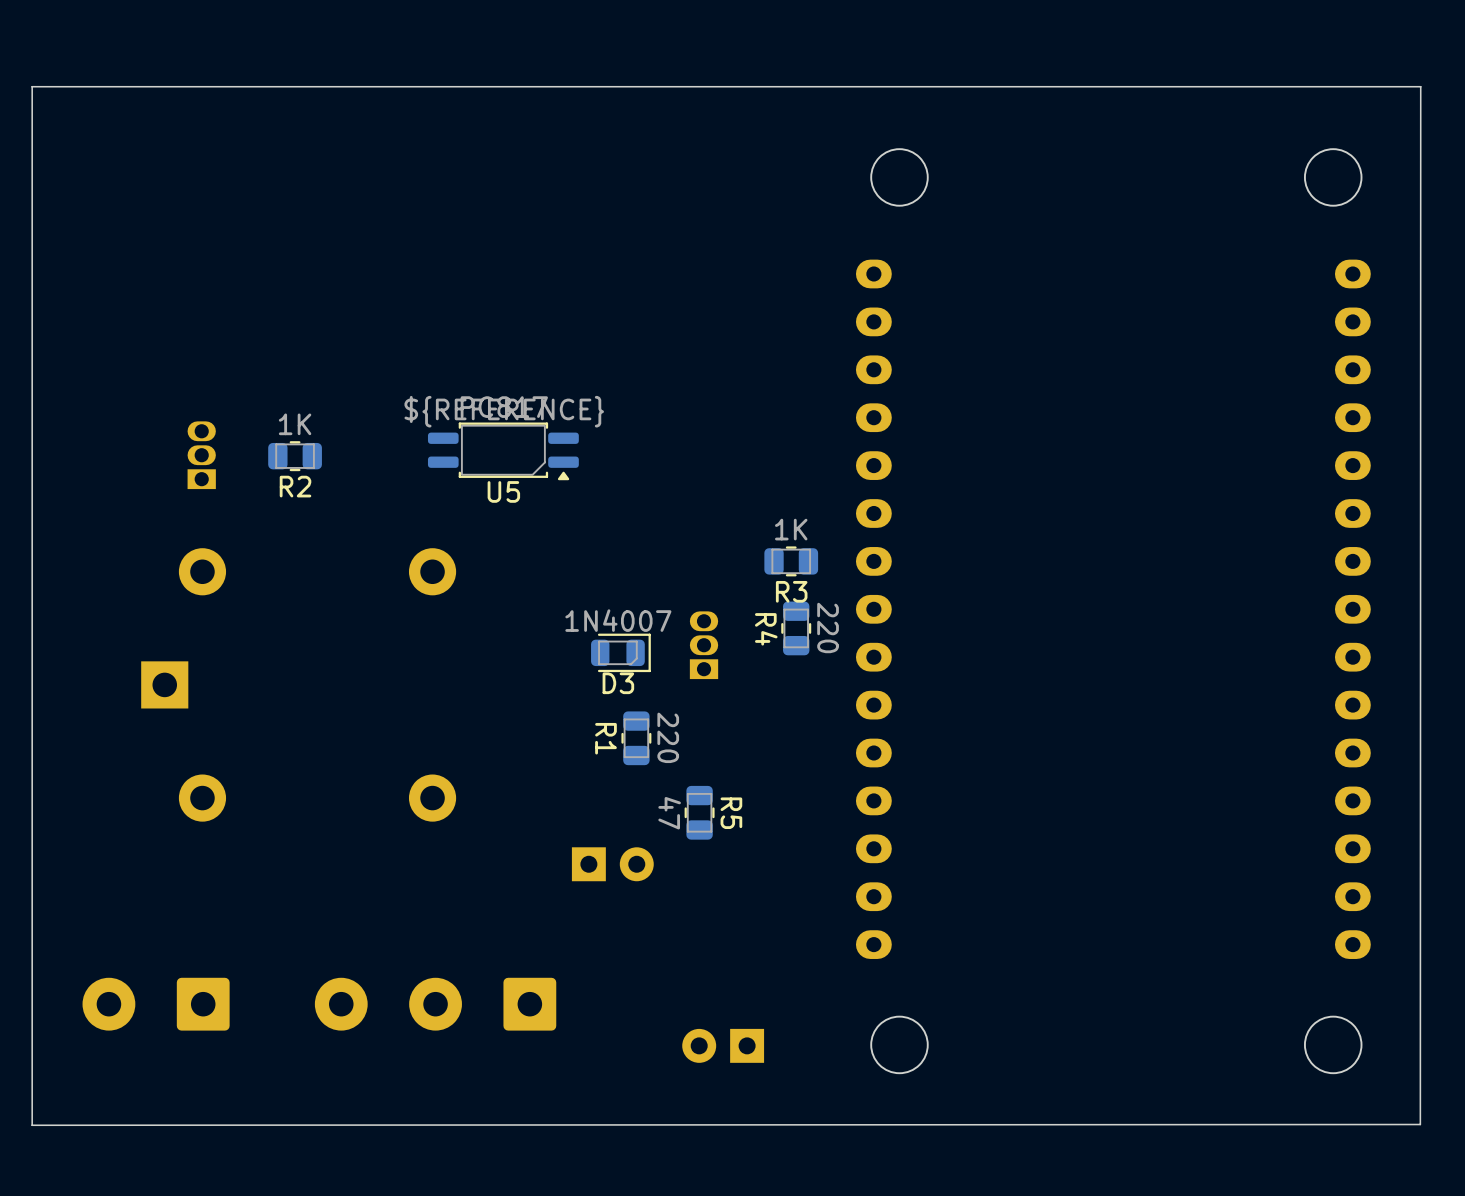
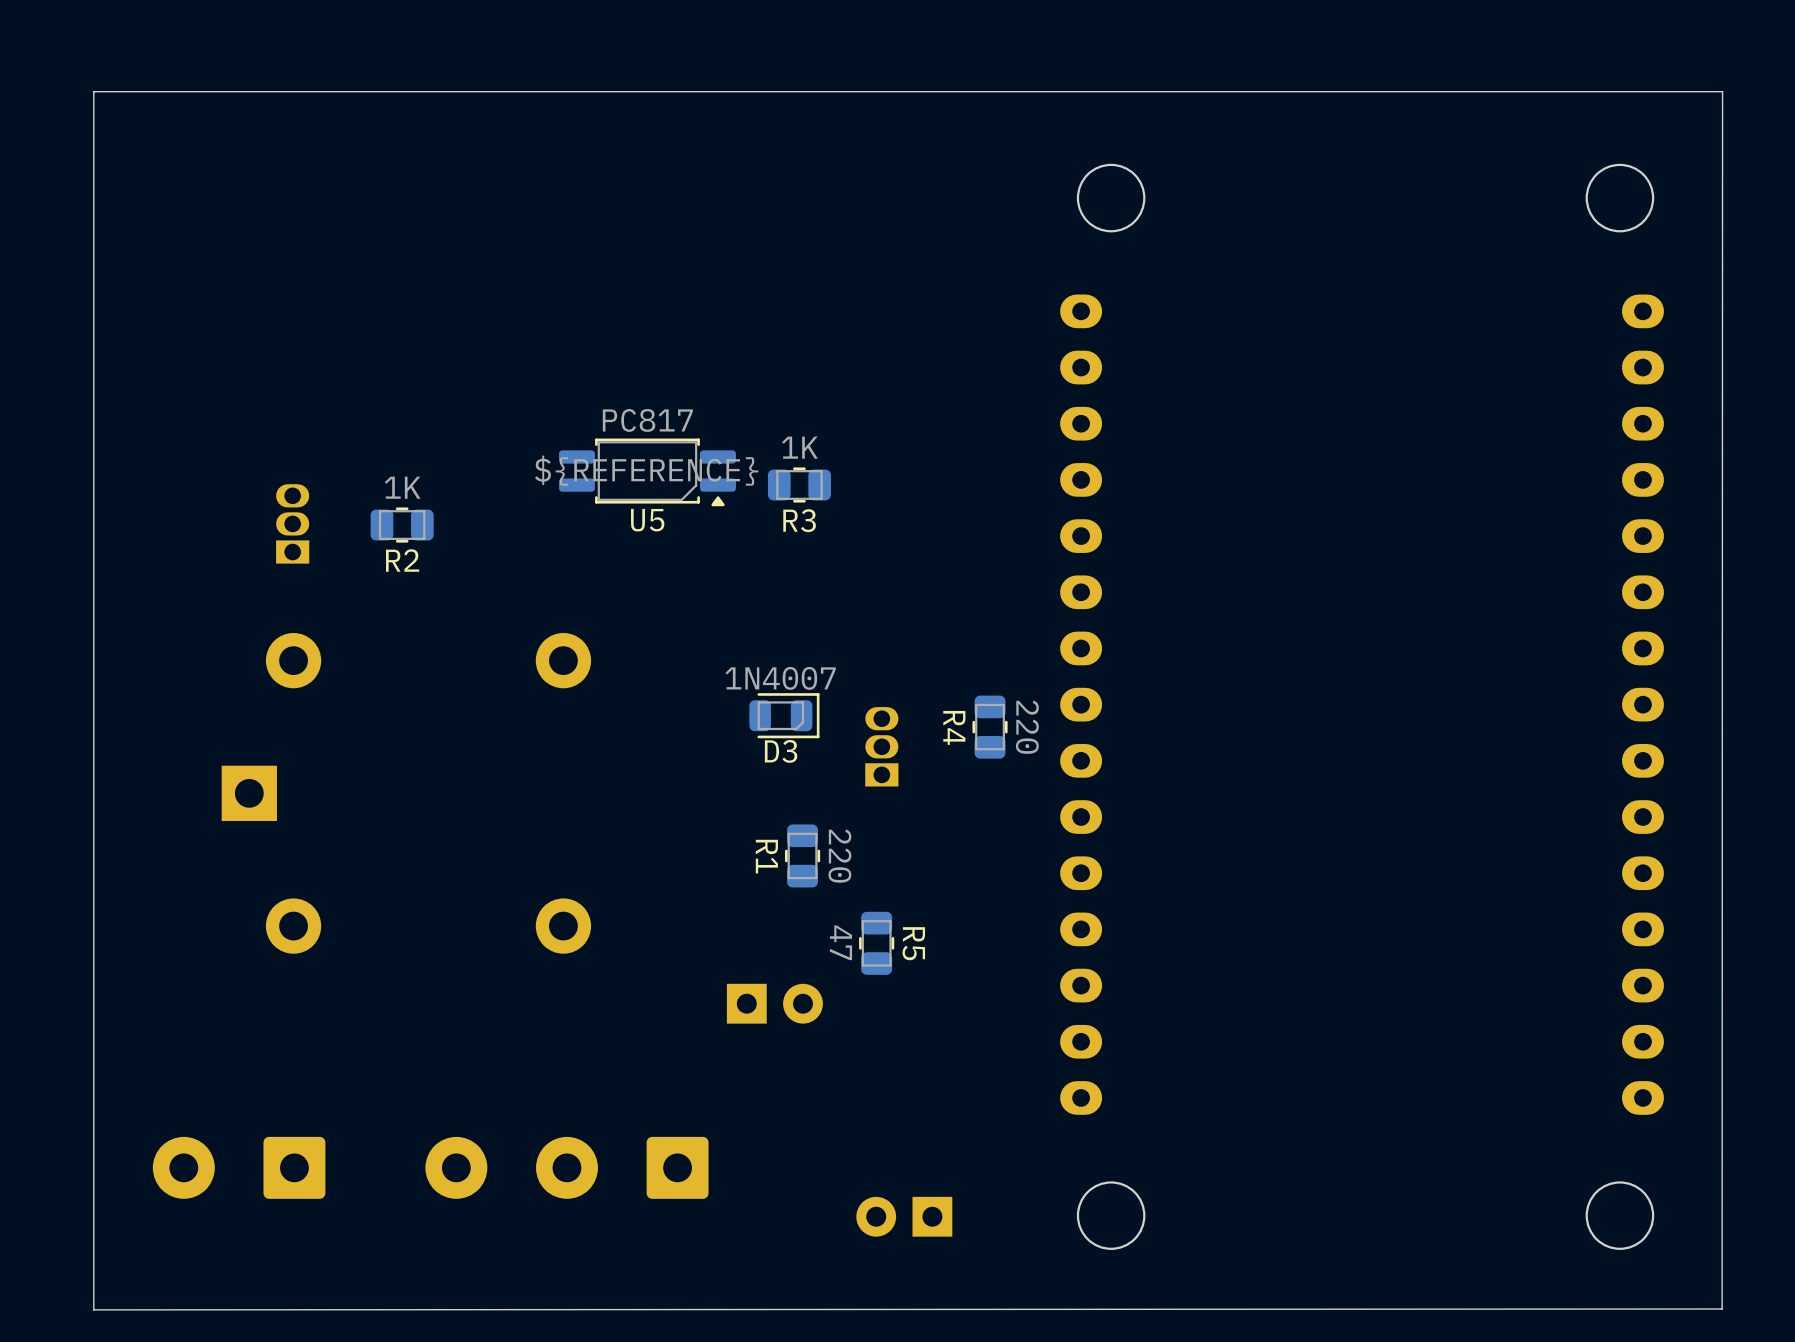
U5 position: (503, 451) -> (647, 472)
R3 position: (791, 561) -> (799, 484)
D3 position: (620, 652) -> (784, 715)

